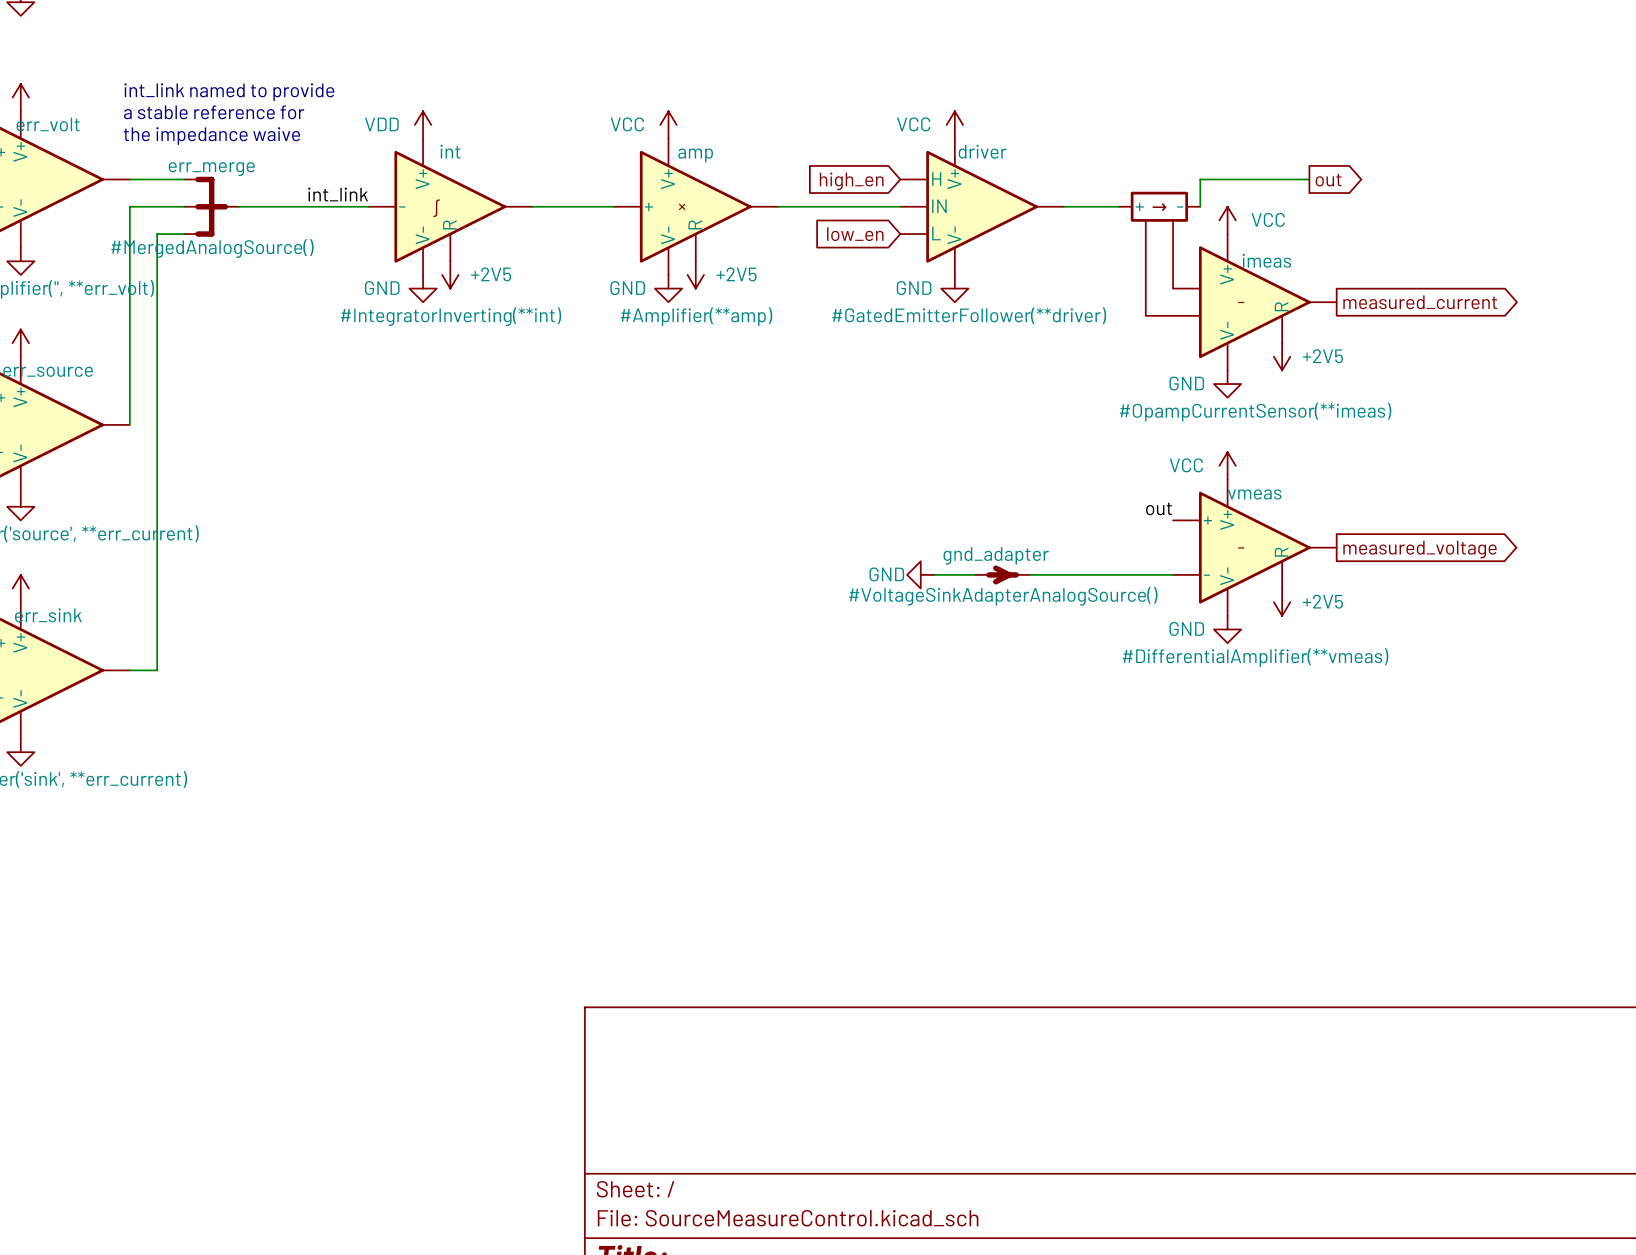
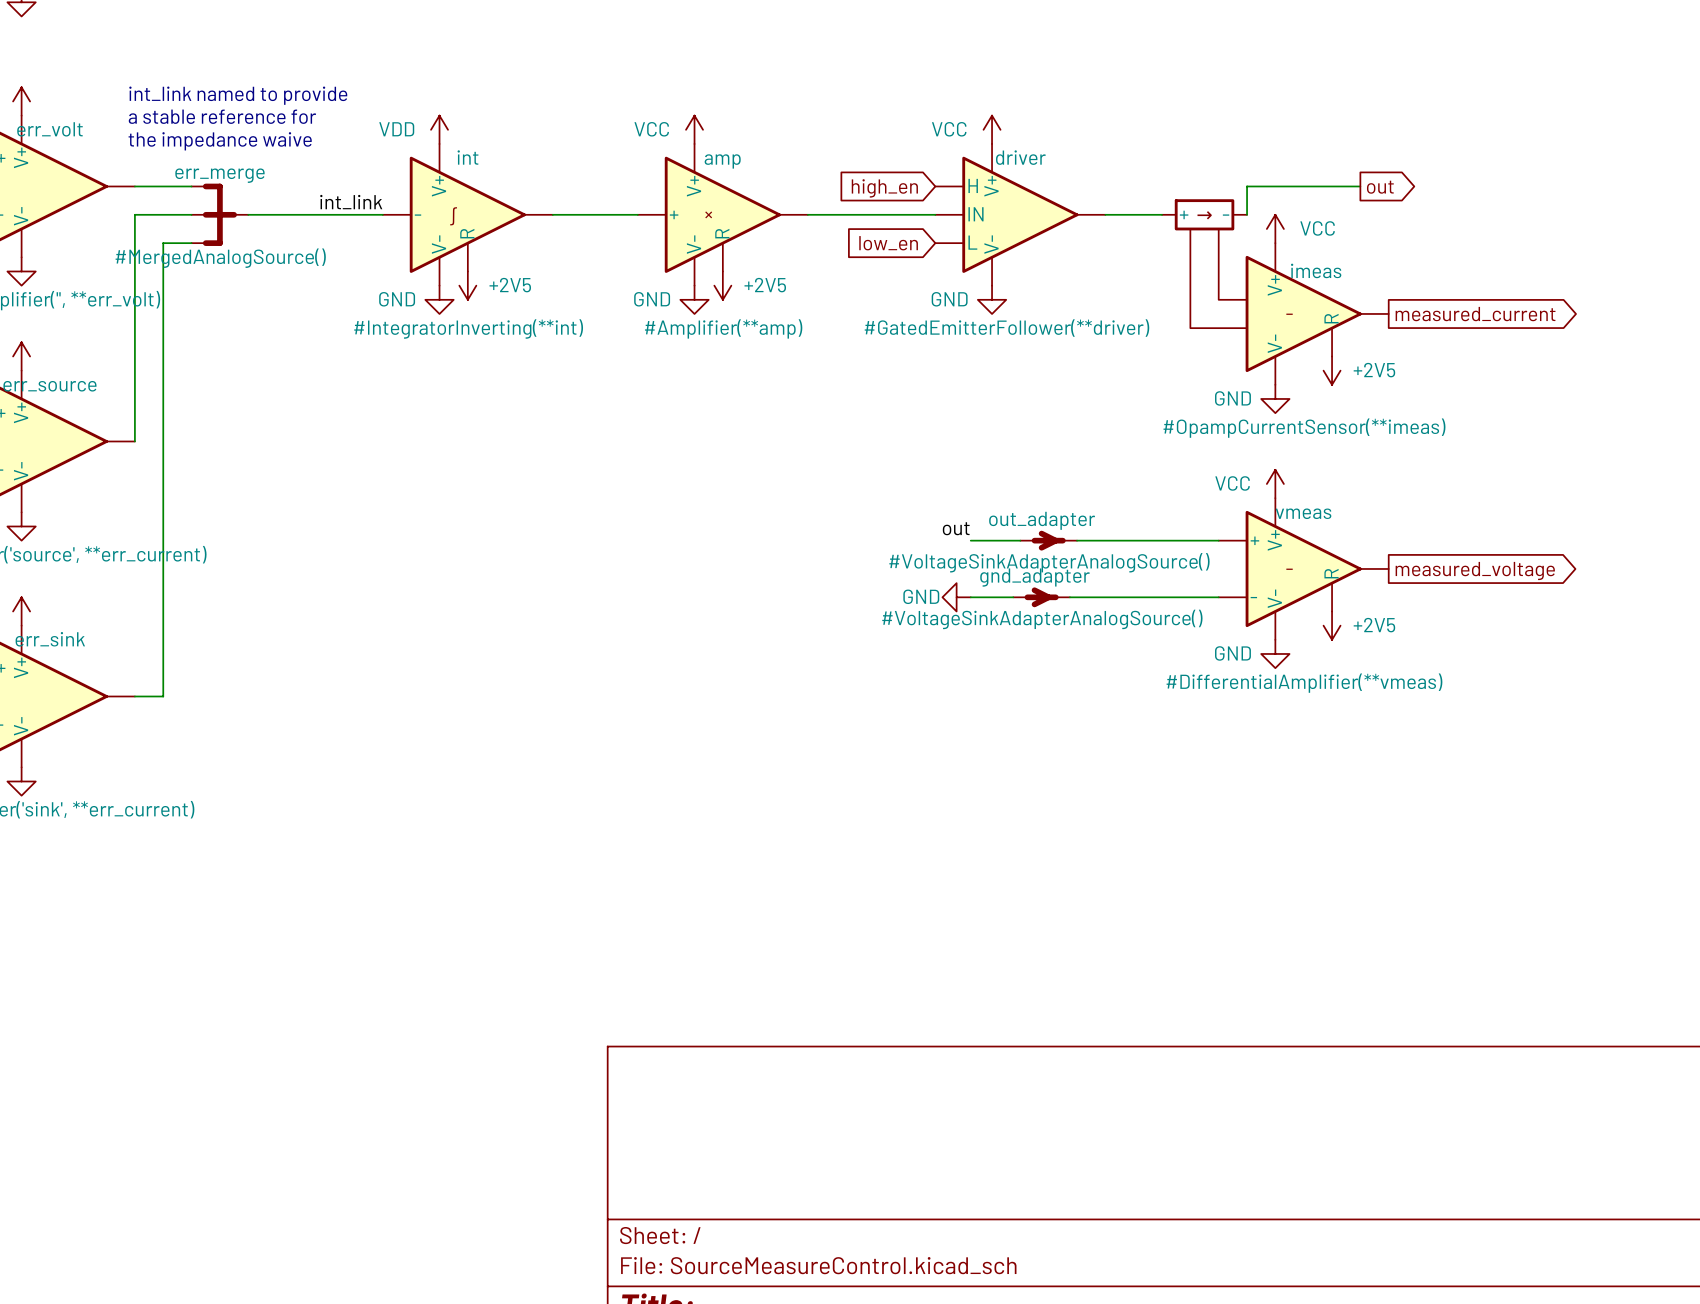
label position: out (1159, 508) -> out (956, 528)
wire: none -> (970, 540) (1020, 540)
out_adapter: none -> #VoltageSinkAdapterAnalogSource() (1048, 540)
wire: none -> (1077, 540) (1218, 540)

